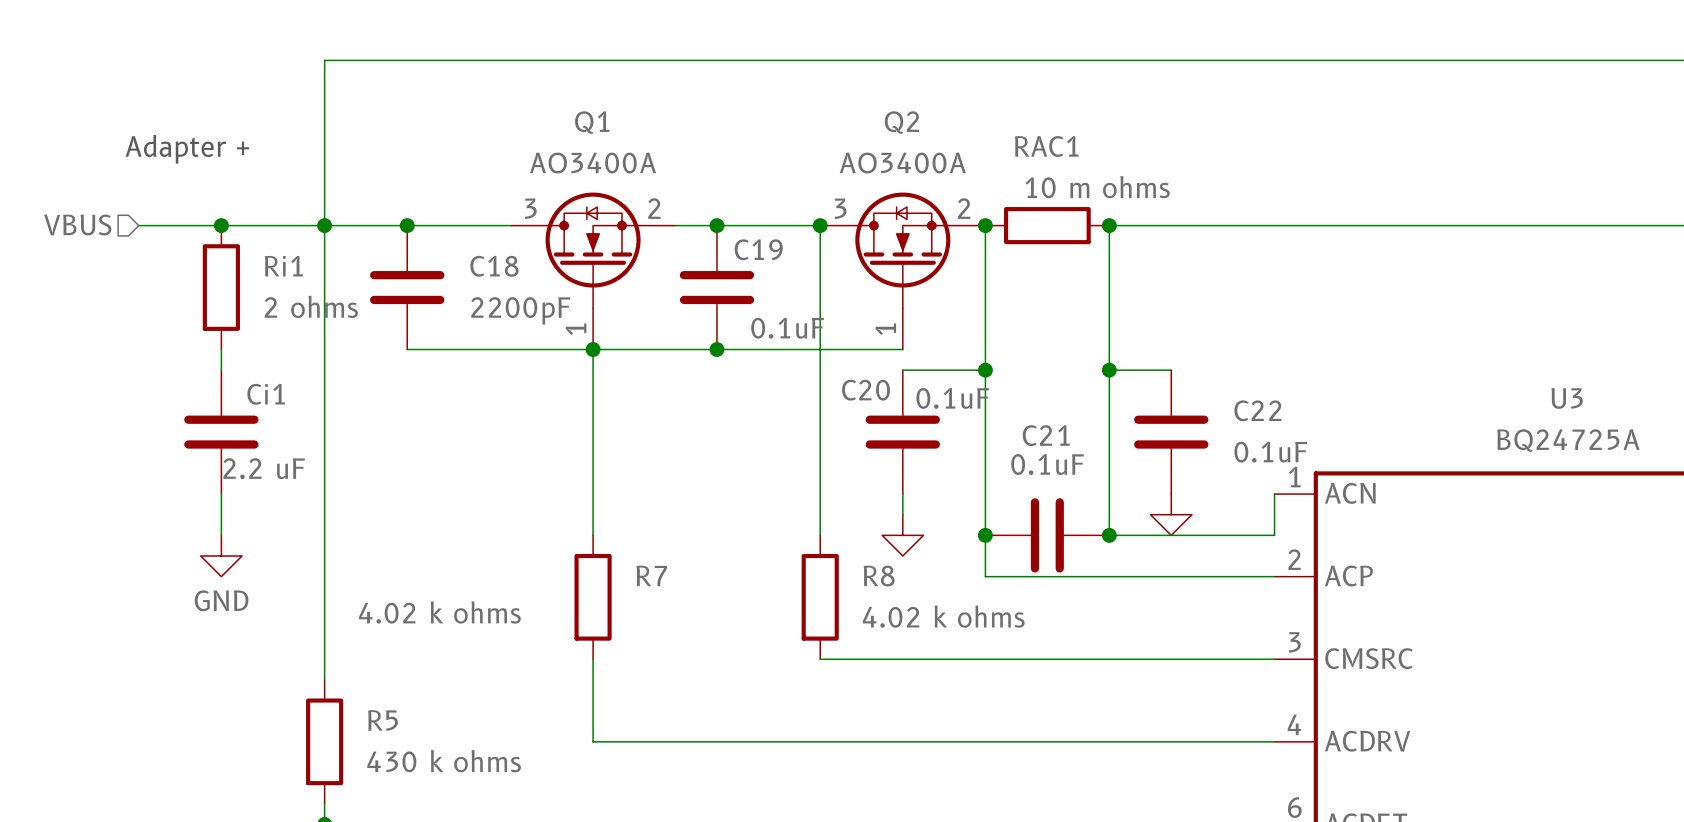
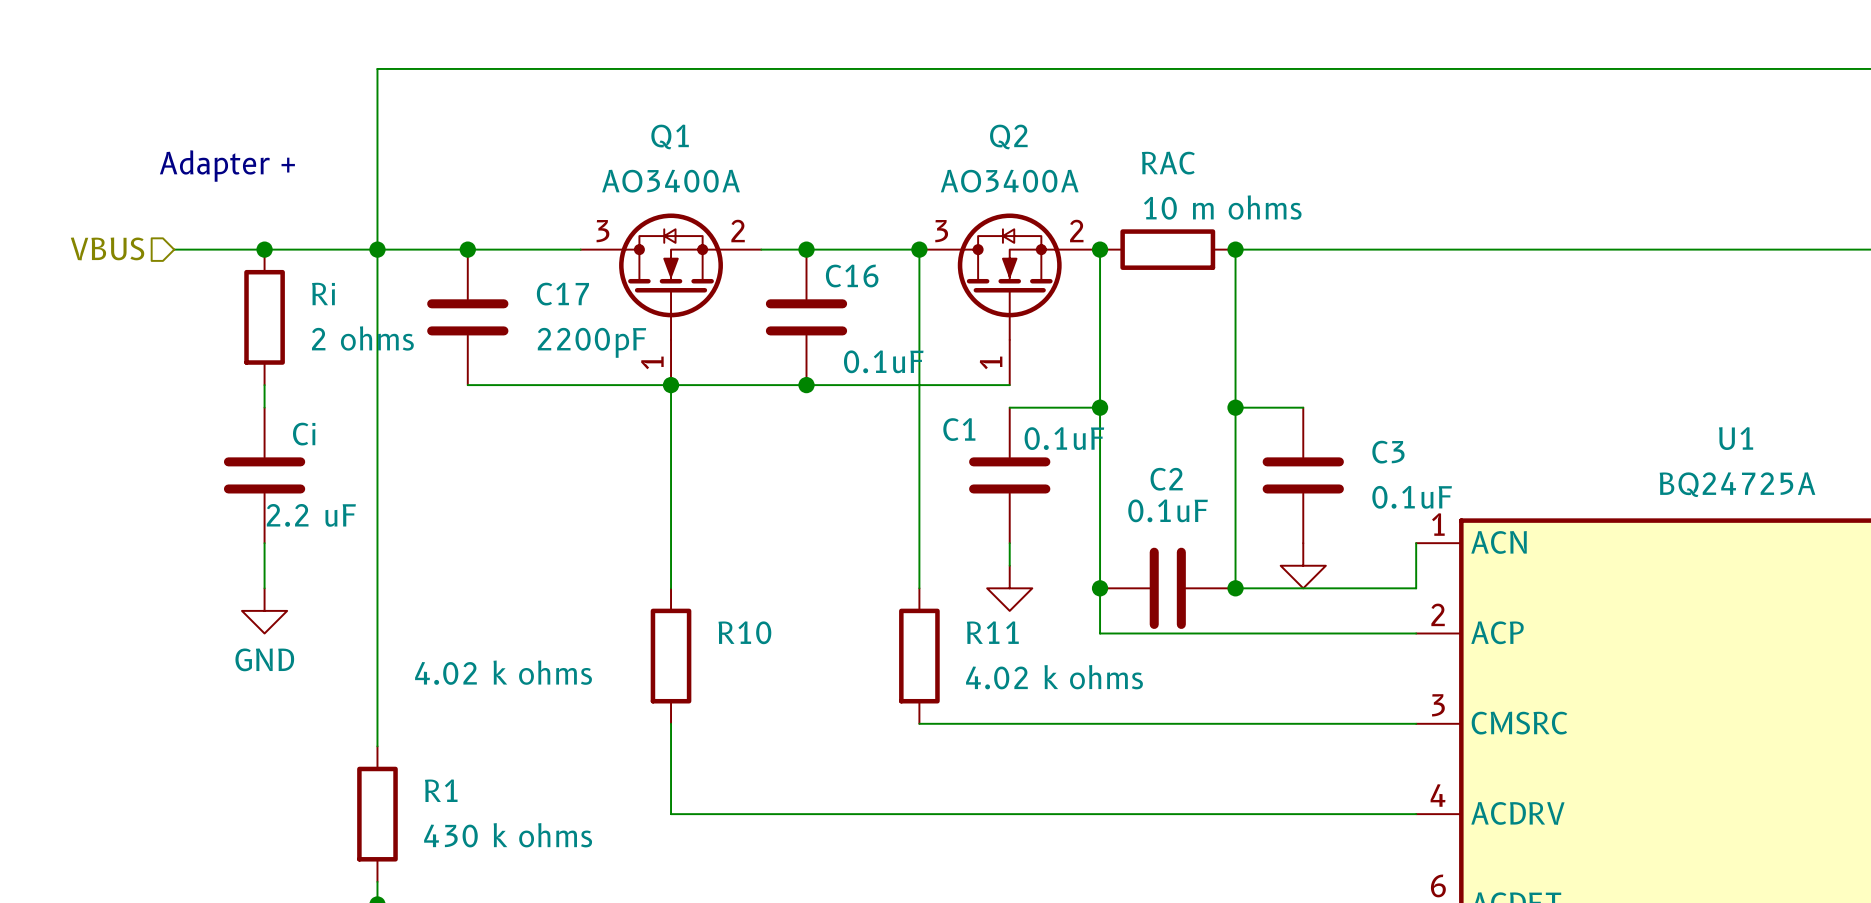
RAC1 name: RAC1 (1046, 146) -> RAC (1168, 163)
C19 name: C19 (758, 249) -> C16 (852, 276)
Ri1 name: Ri1 (283, 266) -> Ri (323, 293)
C18 name: C18 (494, 266) -> C17 (562, 294)
C20 name: C20 (866, 390) -> C1 (959, 429)
Ci1 name: Ci1 (266, 394) -> Ci (304, 434)
U3 name: U3 (1567, 398) -> U1 (1736, 438)
C22 name: C22 (1257, 410) -> C3 (1388, 452)
C21 name: C21 (1046, 435) -> C2 (1166, 479)
R7 name: R7 (651, 575) -> R10 (744, 632)
R8 name: R8 (879, 576) -> R11 (992, 632)
R5 name: R5 (382, 720) -> R1 (441, 790)

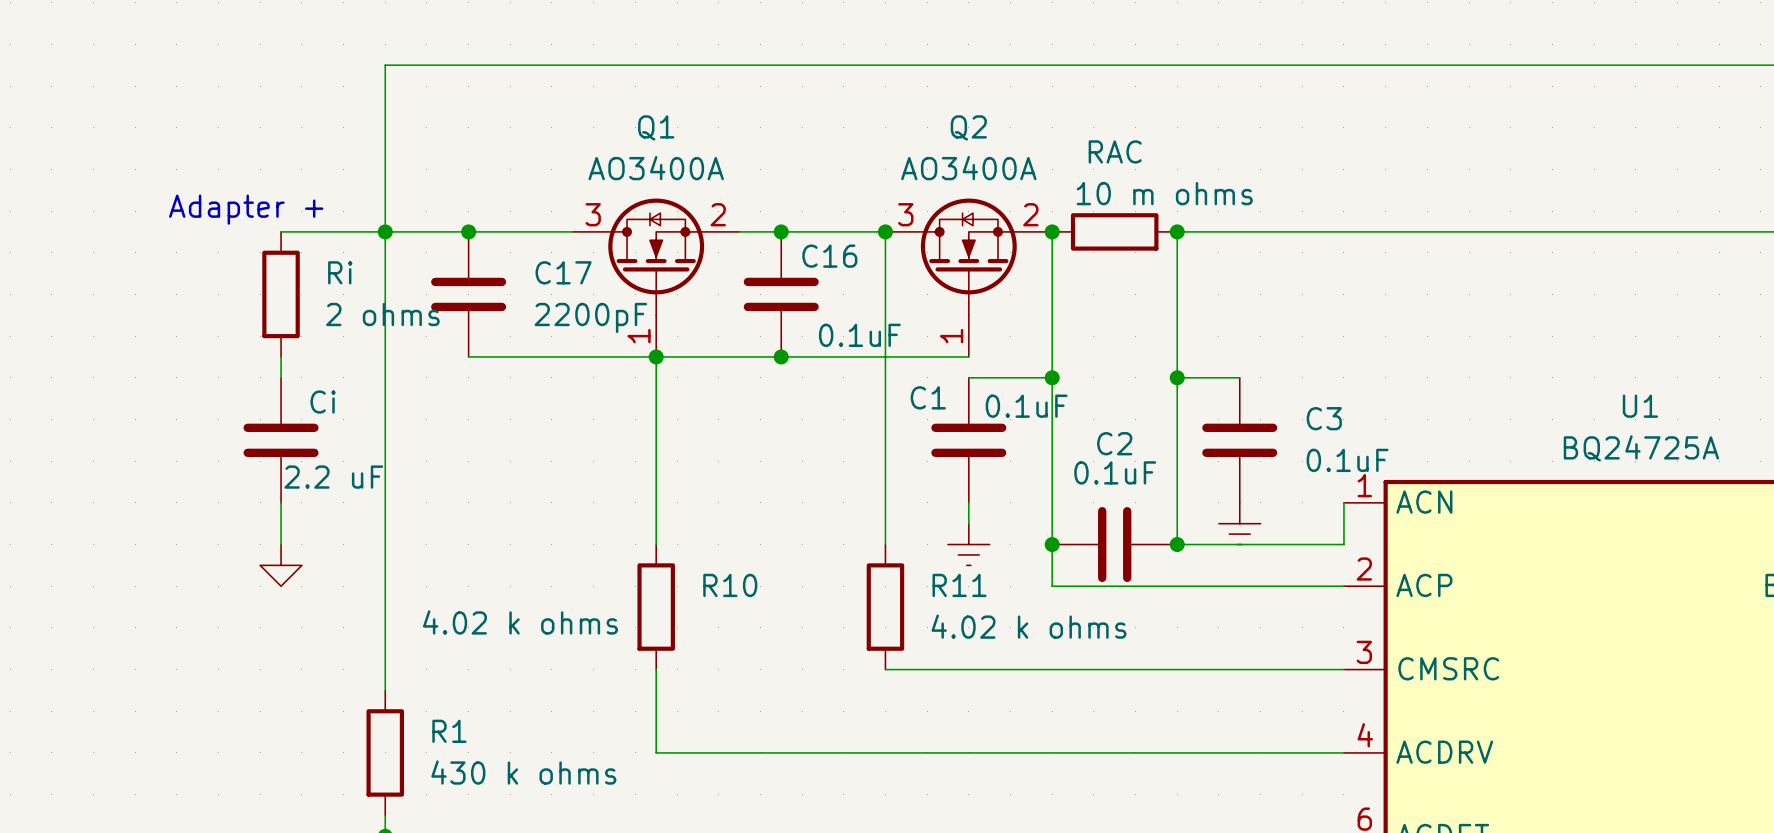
text position: Adapter + (227, 166) -> Adapter + (246, 209)
hierarchical label: VBUS (107, 248) -> none
wire: (174, 249) (264, 249) -> none
junction: (264, 249) -> none
power symbol shape: [1280, 543, 1326, 589] -> [1218, 502, 1261, 545]
power symbol shape: [987, 565, 1033, 611] -> [947, 523, 990, 566]
power symbol text: GND (264, 659) -> none

